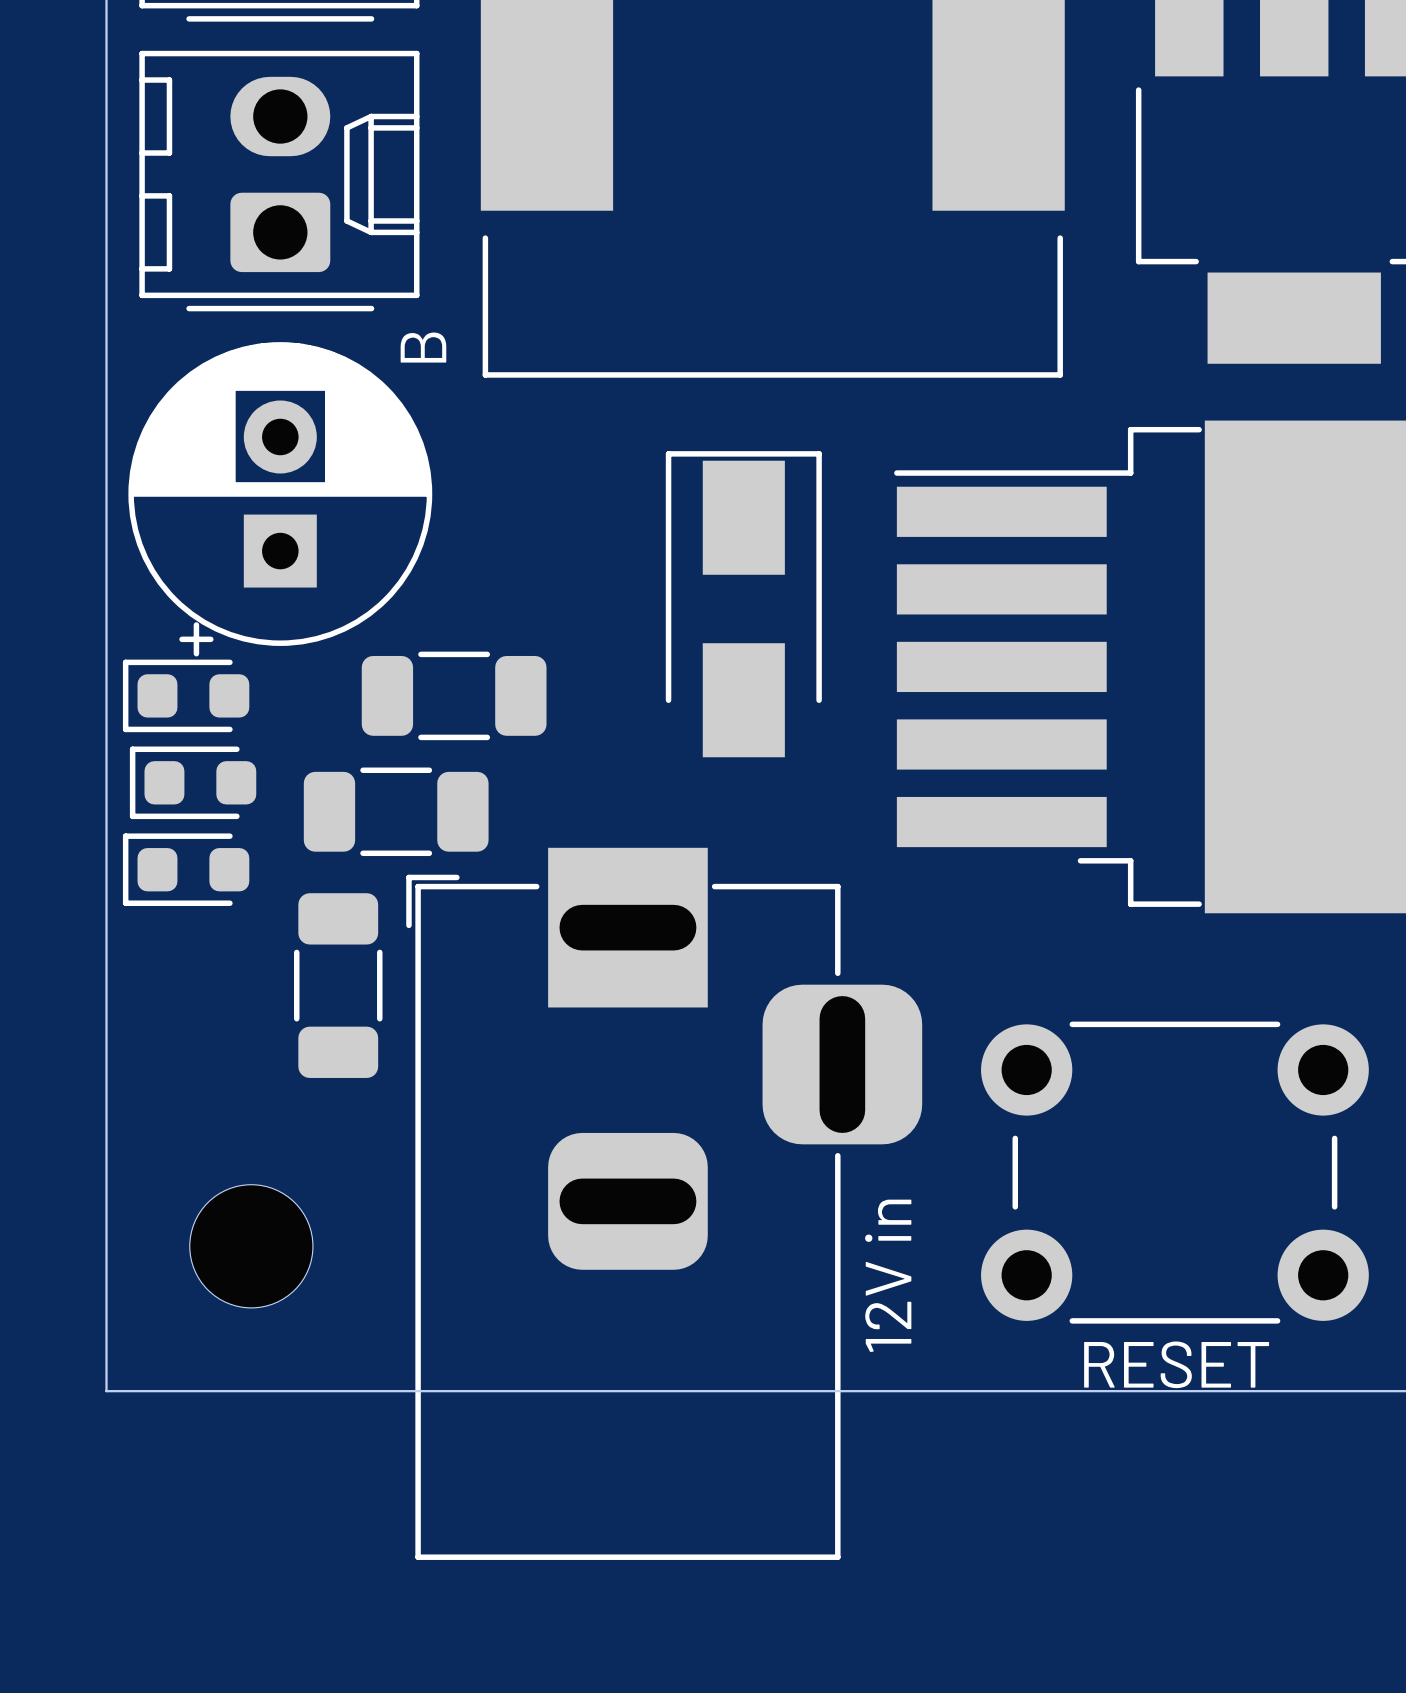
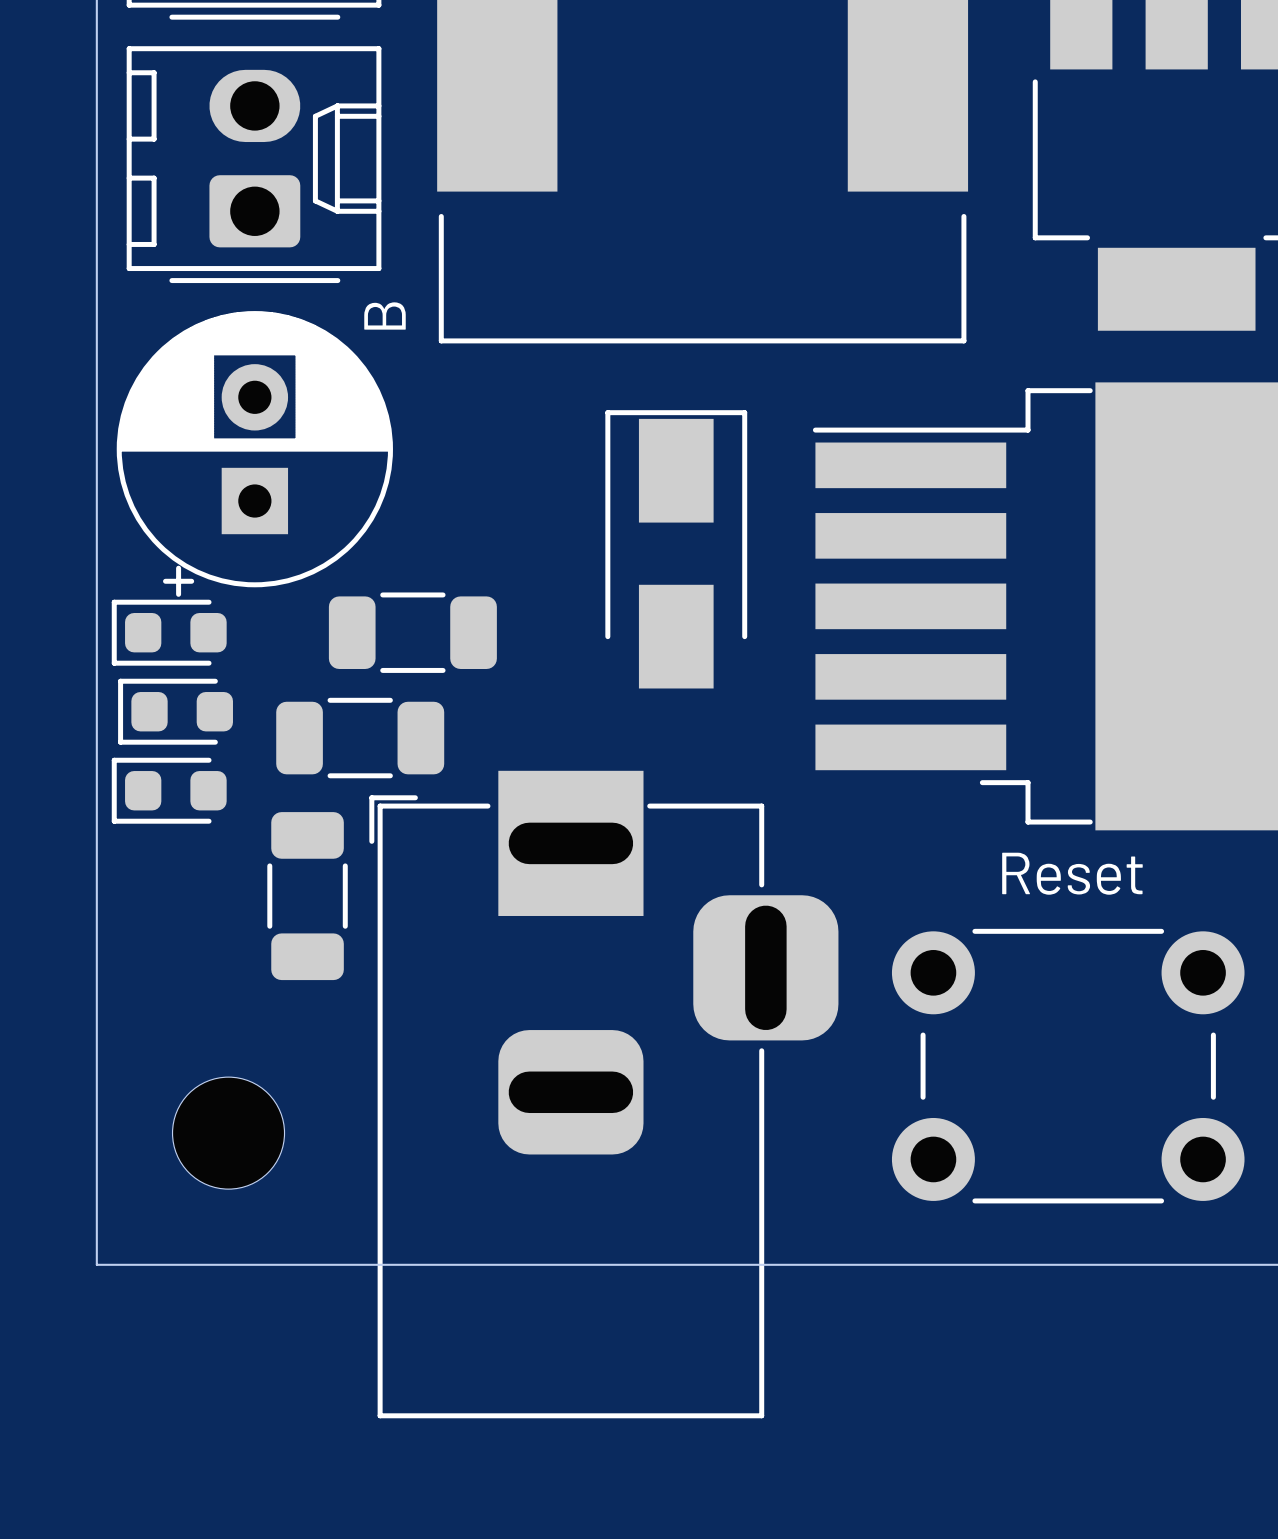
text: none -> Reset (1072, 873)
12V in name: 12V in (888, 1275) -> none
RESET name: RESET (1176, 1364) -> none

